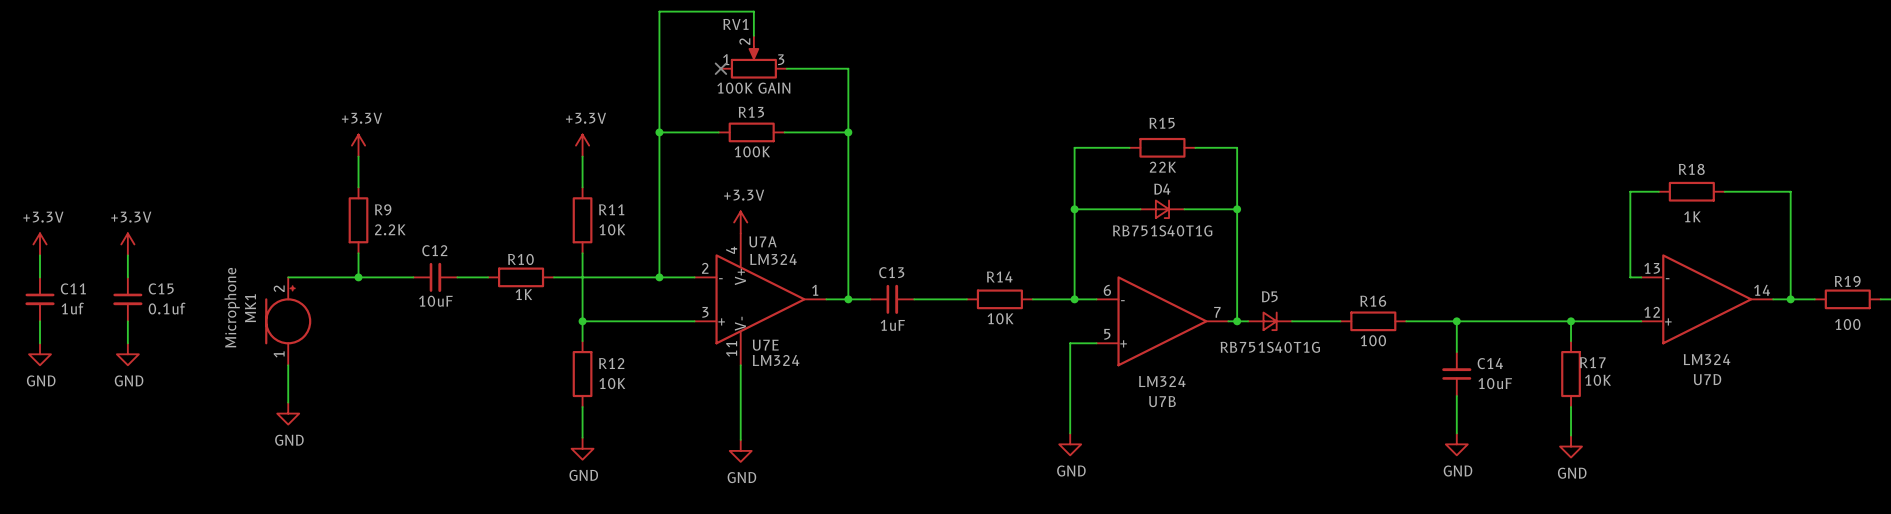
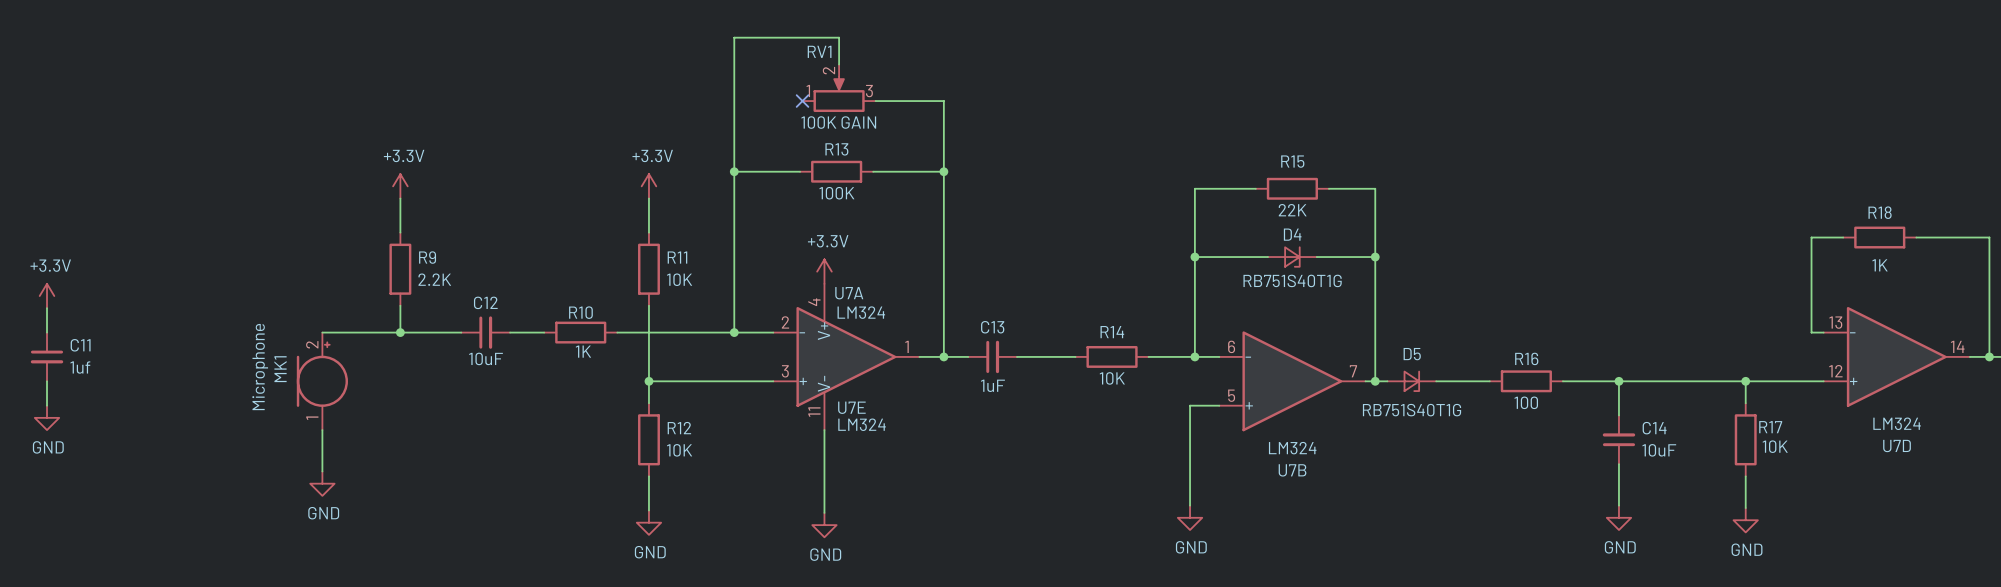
power symbol: +3.3V (127, 244) -> none
wire: (127, 255) (127, 277) -> none
C15: 0.1uf (127, 299) -> none
wire: (127, 321) (127, 343) -> none
power symbol: GND (127, 354) -> none

